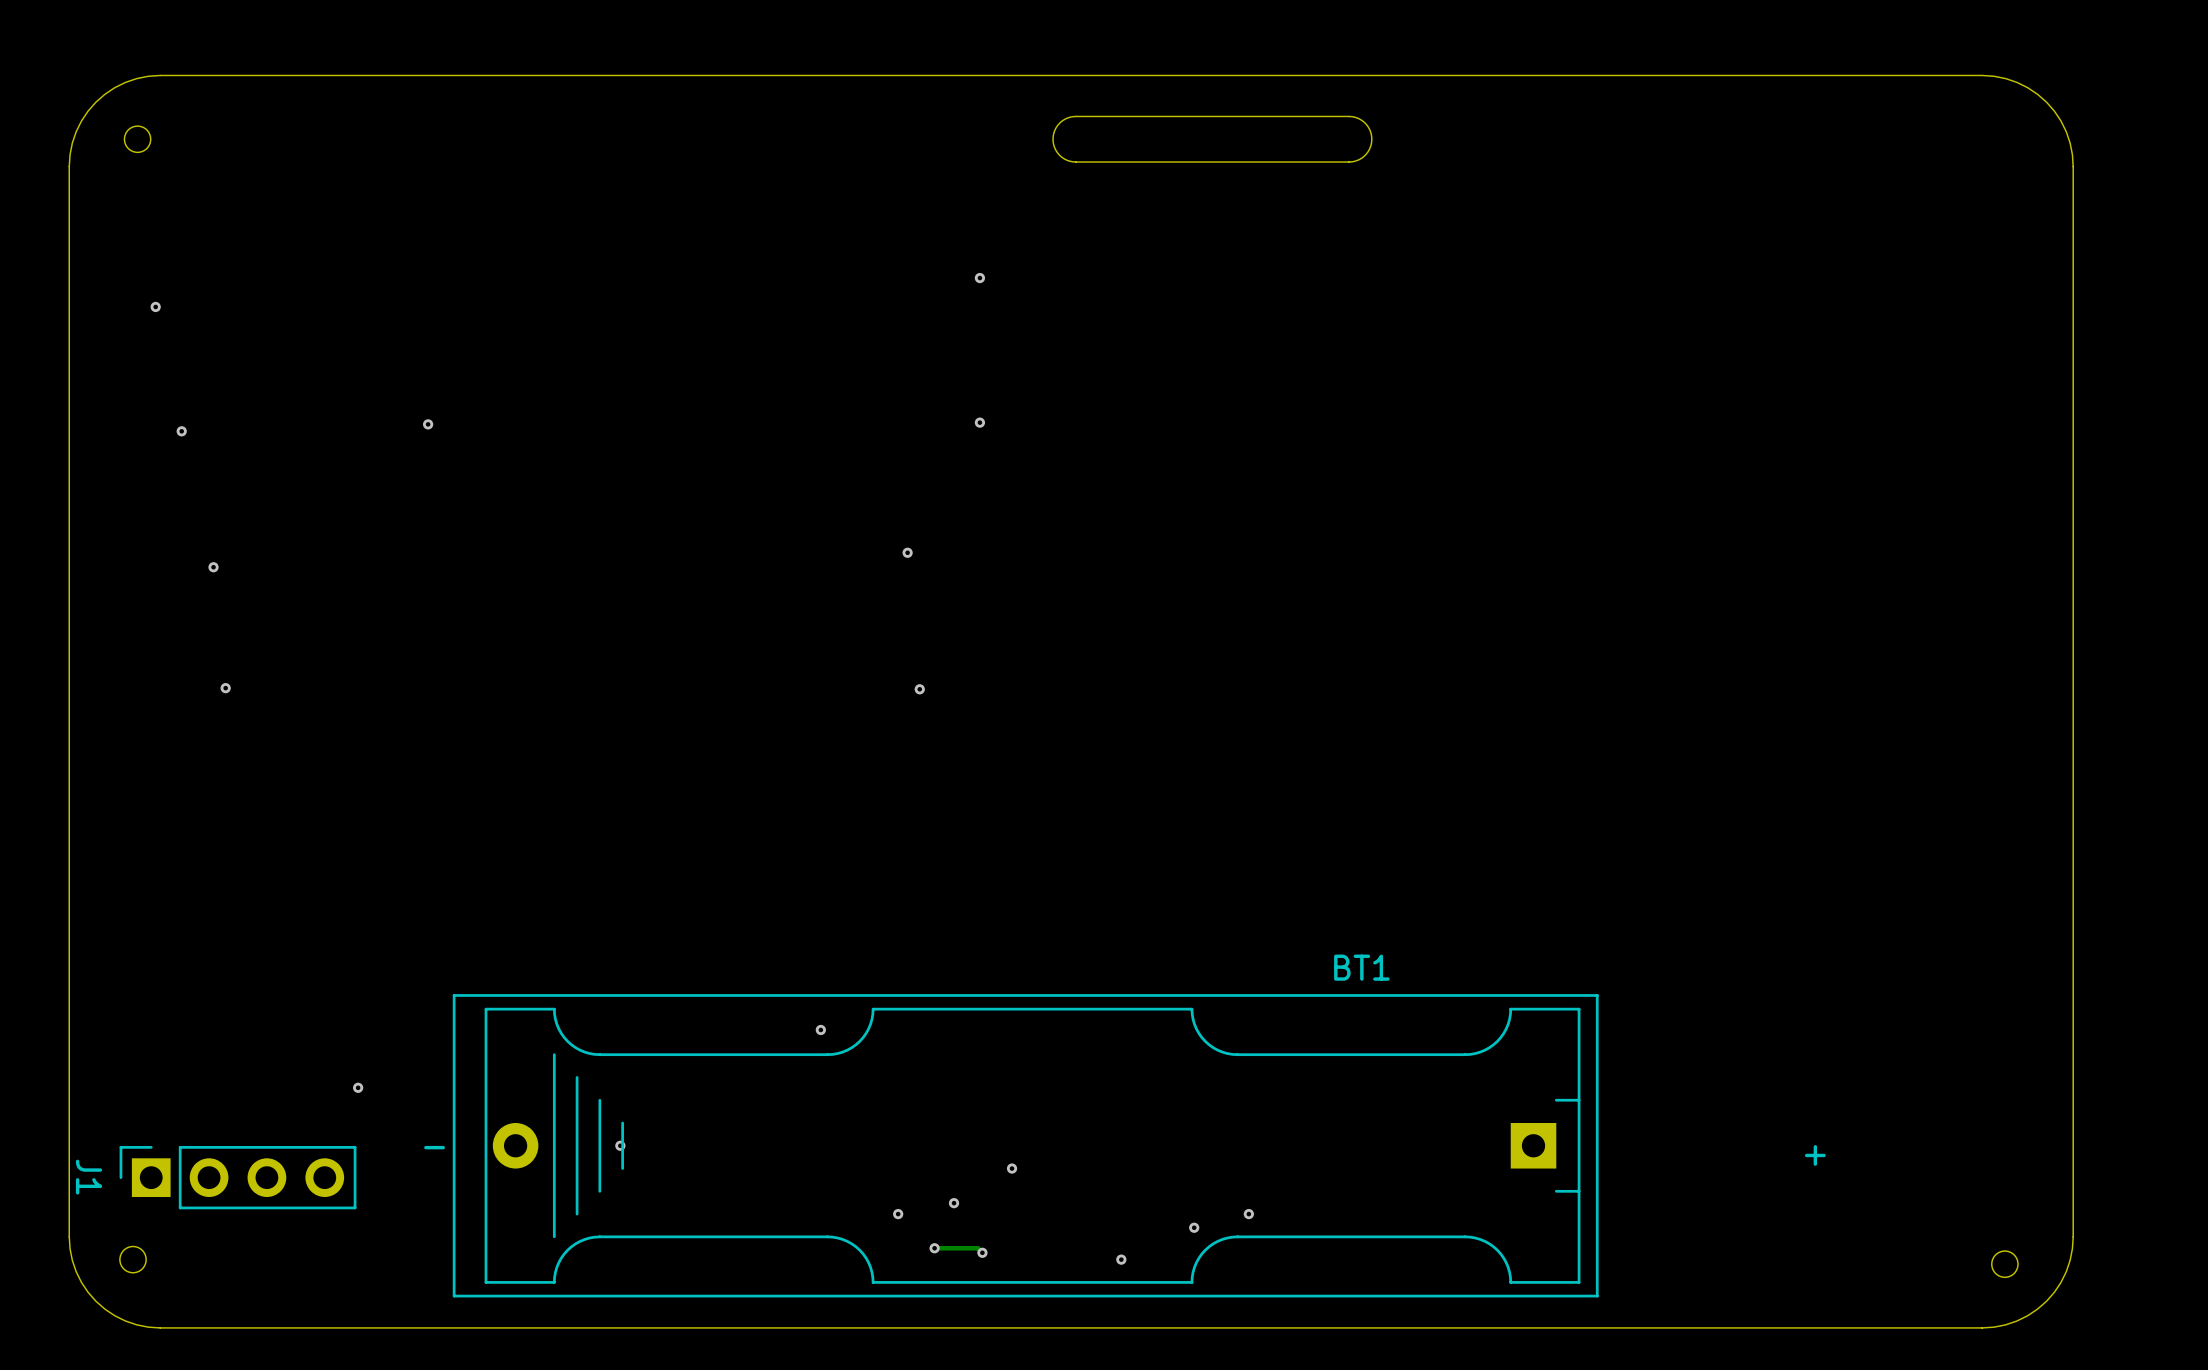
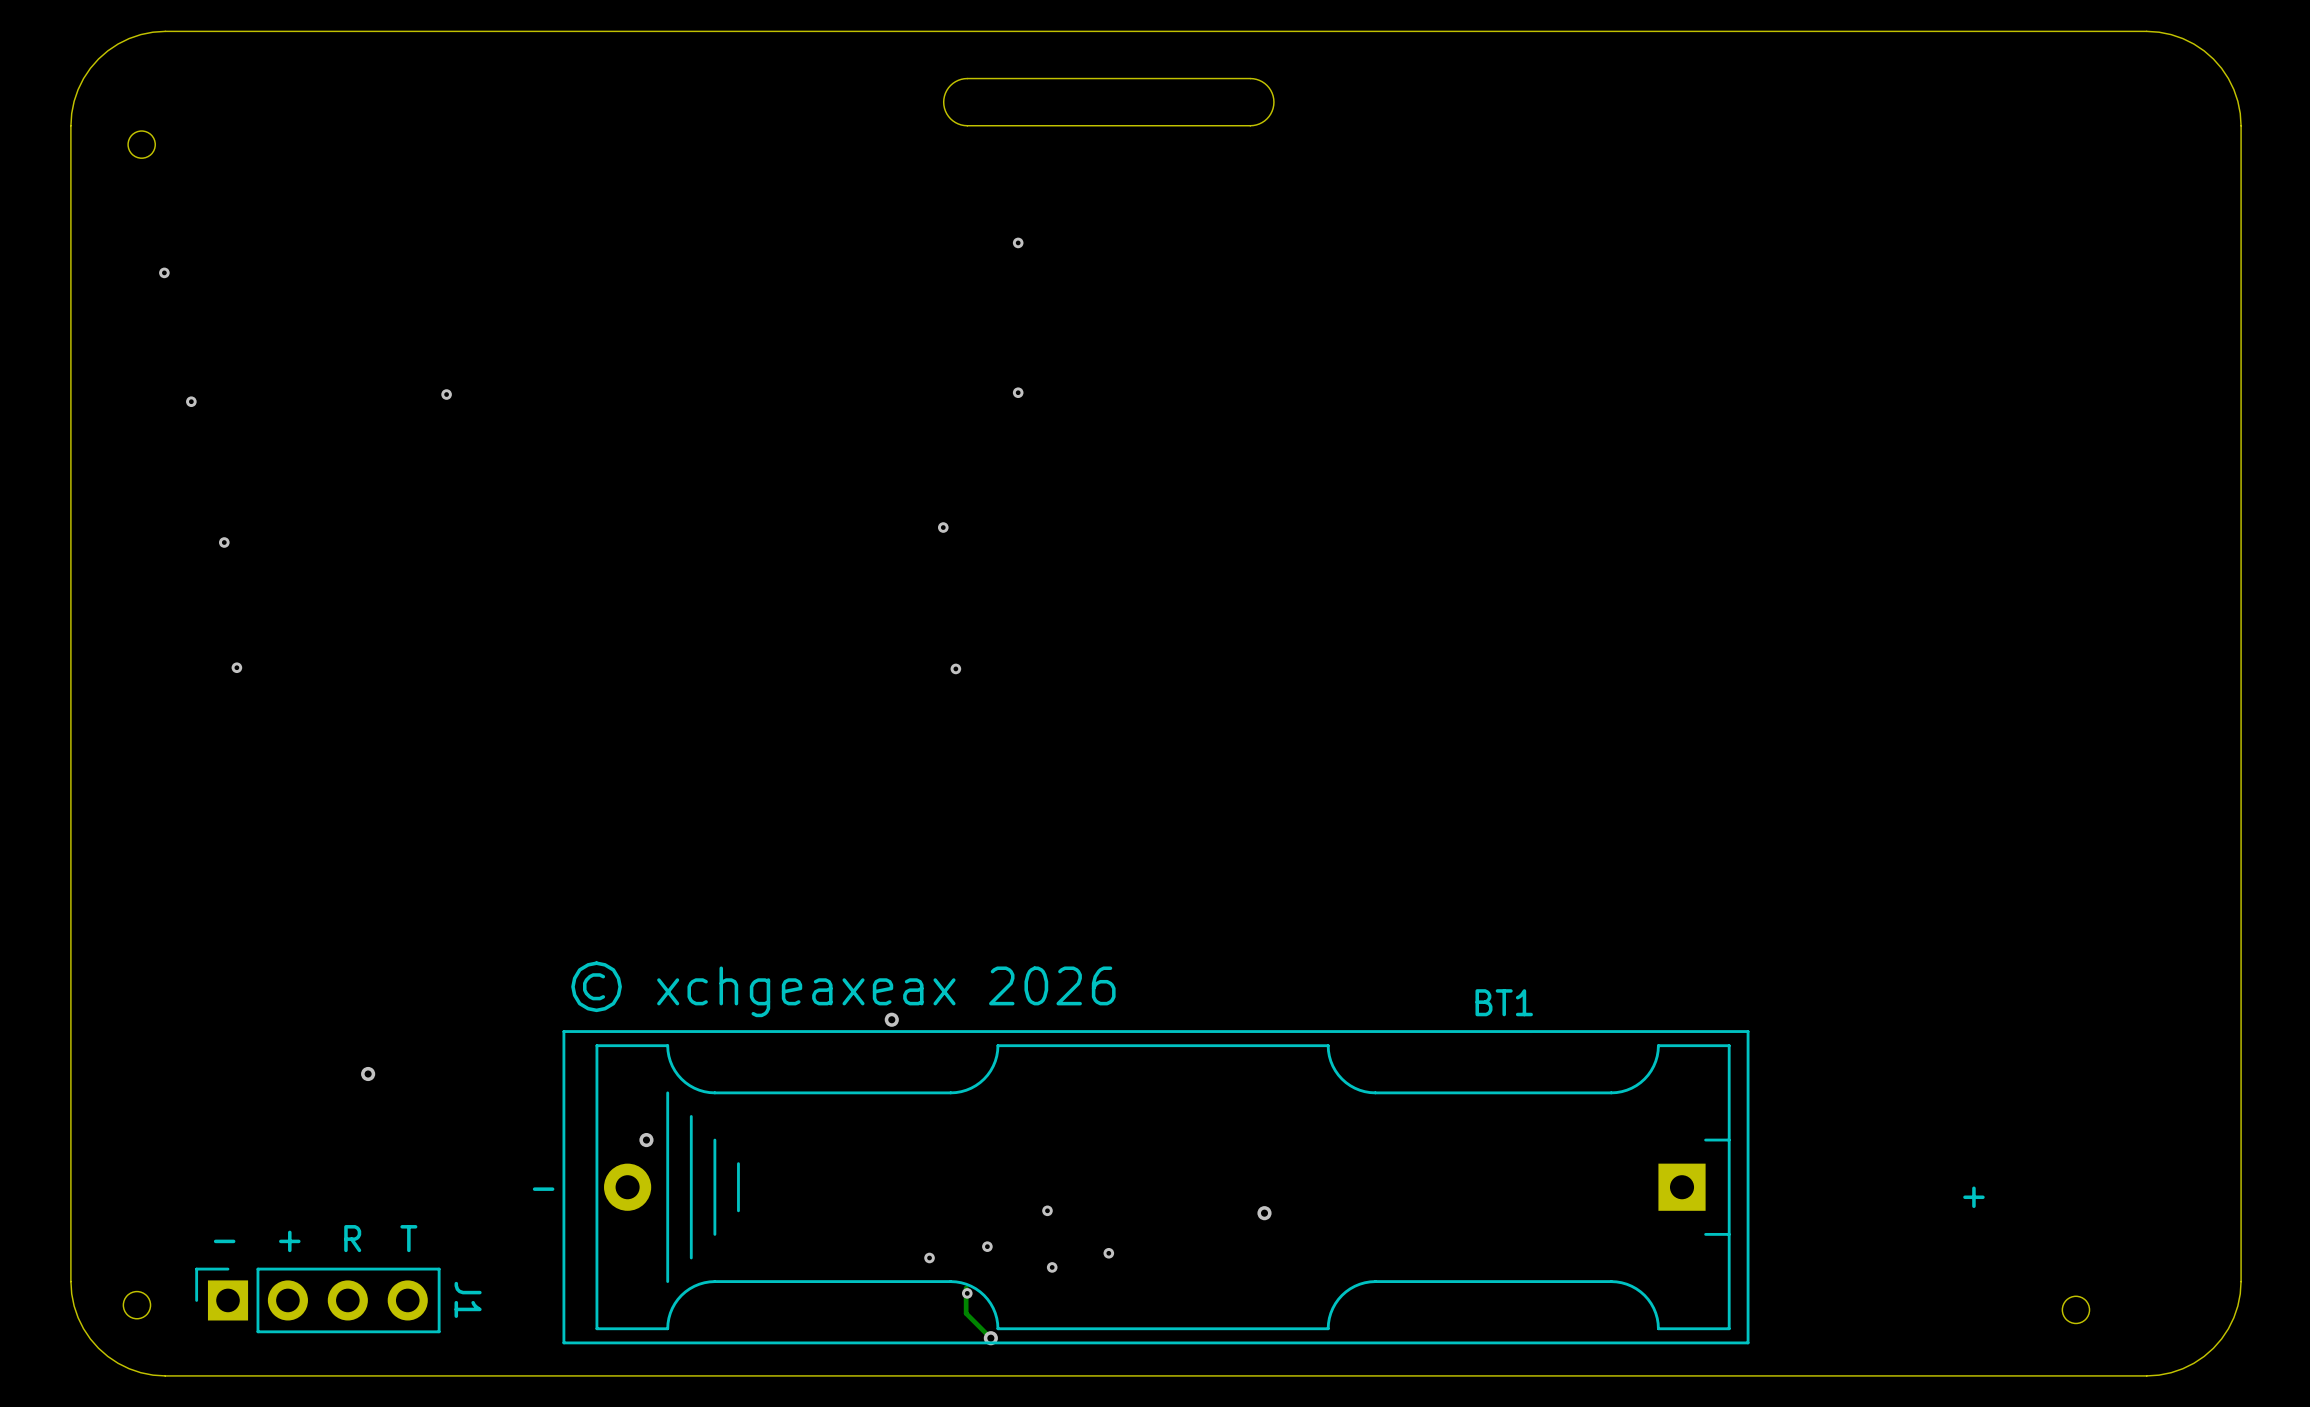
board edge: (934, 75) (148, 76) (125, 82) (114, 87) (95, 102) (88, 111) (76, 131) (70, 154) (69, 166) -> (967, 78) (958, 80) (950, 85) (945, 93) (943, 102) (945, 111) (950, 118) (958, 123) (967, 125) (1253, 125) (1267, 118) (1272, 111) (1273, 102) (1272, 93) (1267, 85) (1259, 80) (1250, 78)
board edge: (1207, 75) (1982, 75) (2005, 78) (2027, 87) (2046, 102) (2061, 121) (2070, 142) (2073, 166) (2073, 1236) (2070, 1260) (2066, 1271) (2061, 1282) (2046, 1301) (2027, 1315) (2016, 1321) (1994, 1327) (1982, 1327) -> (70, 172) (71, 113) (78, 89) (83, 78) (98, 59) (118, 44) (140, 34) (165, 31) (2146, 31) (2171, 34) (2193, 44) (2213, 59) (2228, 78) (2237, 101) (2241, 125) (2240, 1293) (2233, 1317) (2221, 1339) (2204, 1356) (2182, 1368) (2171, 1372) (2146, 1375) (2052, 1375)
board edge: (1349, 116) (1073, 116) (1062, 120) (1057, 126) (1053, 141) (1058, 154) (1073, 161) (1351, 161) (1359, 159) (1367, 152) (1371, 136) (1364, 122) (1349, 116) -> none
via: none -> (164, 272)
via position: (979, 278) -> (1018, 242)
via: (155, 306) -> none
via: none -> (191, 401)
via position: (979, 422) -> (1018, 392)
via position: (428, 424) -> (446, 394)
via: (181, 431) -> none
via: none -> (224, 542)
via position: (907, 552) -> (943, 527)
via: (213, 567) -> none
via: none -> (236, 667)
via: (225, 688) -> none
via position: (919, 689) -> (955, 668)
text: none -> © xchgeaxeax 2026 (843, 989)
via: none -> (891, 1019)
via: (820, 1029) -> none
via: none -> (368, 1074)
via: (358, 1087) -> none
via: none -> (646, 1140)
via: (620, 1145) -> none
BT1 position: (1025, 1145) -> (1155, 1187)
via: none -> (1264, 1213)
J1 name position: J1 (89, 1177) -> J1 (468, 1299)
J1 position: (238, 1177) -> (317, 1300)
text: none -> - + R T (315, 1238)
via: none -> (1108, 1253)
via: (1248, 1214) -> none
via: (1194, 1227) -> none
track: none -> (966, 1288) (966, 1313) (990, 1338)
track: (934, 1248) (977, 1248) (982, 1252) -> none
via position: (982, 1252) -> (1052, 1267)
via: (1121, 1259) -> none
via: none -> (990, 1338)

